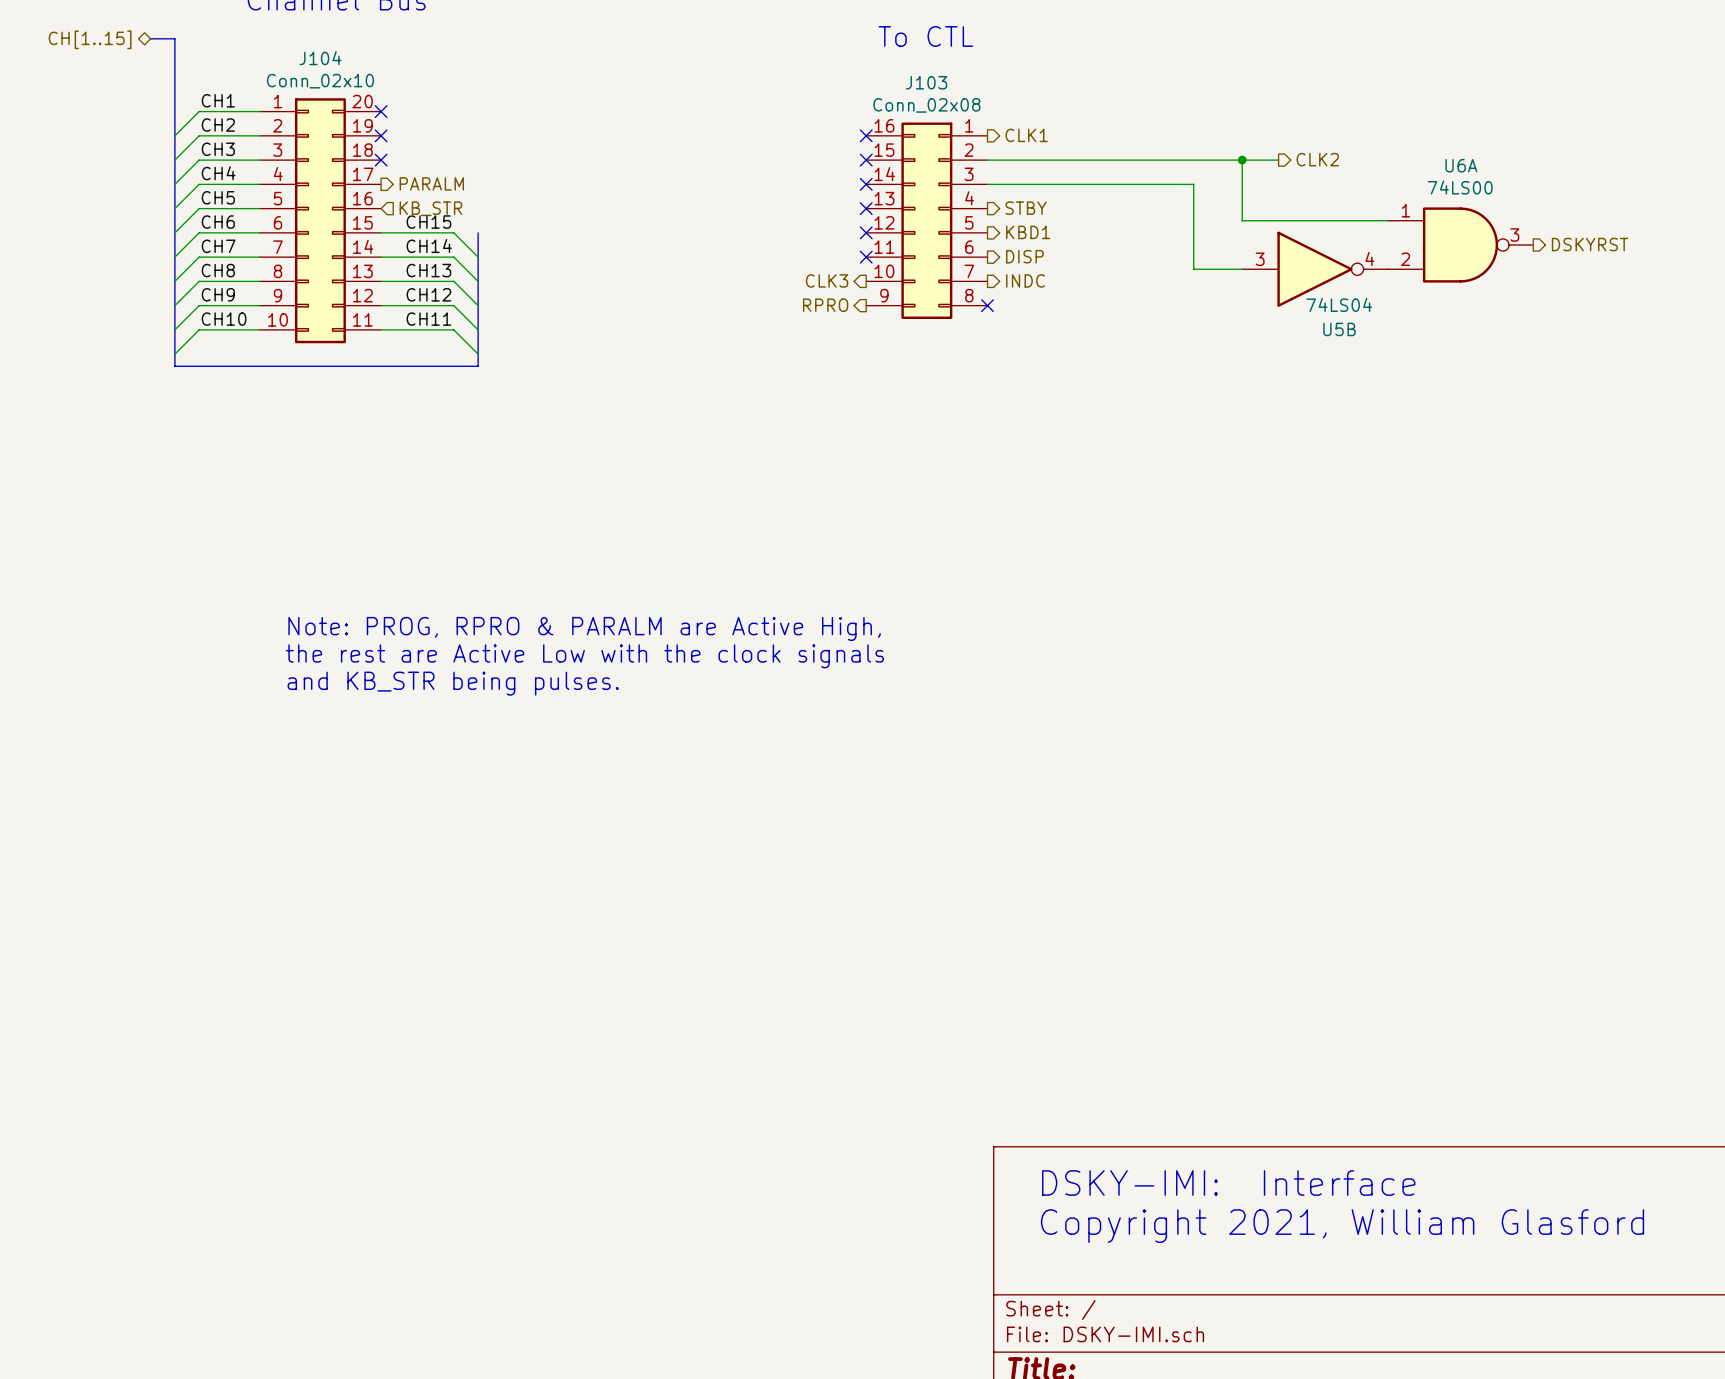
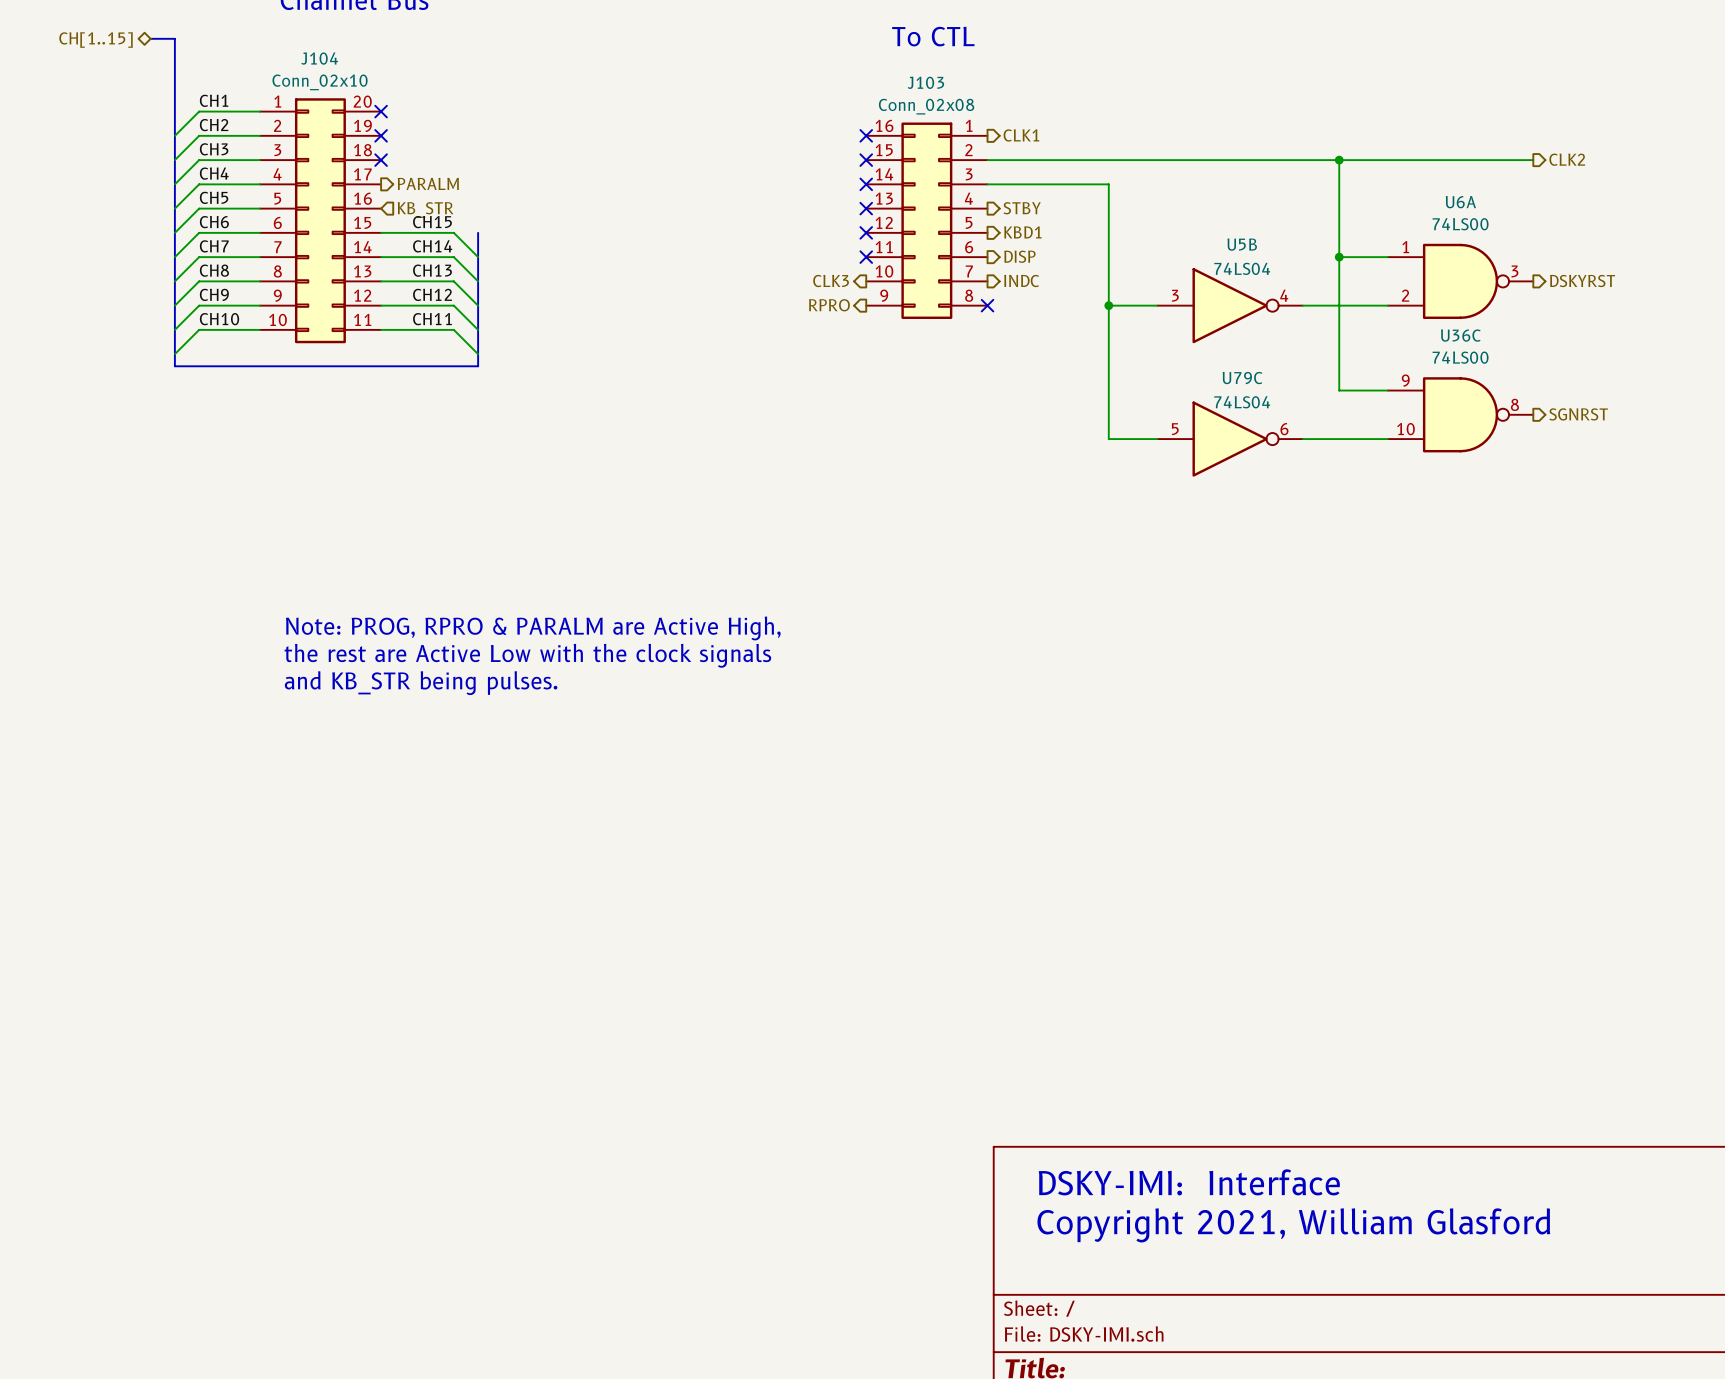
hierarchical label: CLK2 (1317, 159) -> none
hierarchical label: none -> CLK2 (1567, 159)
wire: (1242, 160) (1242, 220) (1387, 220) -> none
junction: (1242, 160) -> none
wire: none -> (1278, 160) (1533, 160)
wire: none -> (1339, 160) (1339, 390) (1387, 390)
junction: none -> (1339, 160)
wire: (1108, 184) (1193, 184) (1193, 269) (1242, 269) -> (1108, 184) (1108, 439) (1157, 439)
hierarchical label position: DSKYRST (1590, 244) -> DSKYRST (1582, 281)
U6A position: (1460, 245) -> (1460, 281)
wire: none -> (1339, 257) (1387, 257)
junction: none -> (1339, 257)
U5B position: (1314, 269) -> (1230, 305)
U5B value position: 74LS04 (1339, 304) -> 74LS04 (1242, 268)
wire: none -> (1108, 305) (1157, 305)
junction: none -> (1108, 305)
wire: none -> (1302, 305) (1387, 305)
U5B name position: U5B (1339, 329) -> U5B (1242, 244)
U36C: none -> 74LS00 (1460, 414)
hierarchical label: none -> SGNRST (1578, 414)
U79C: none -> 74LS04 (1230, 439)
wire: none -> (1302, 439) (1387, 439)

